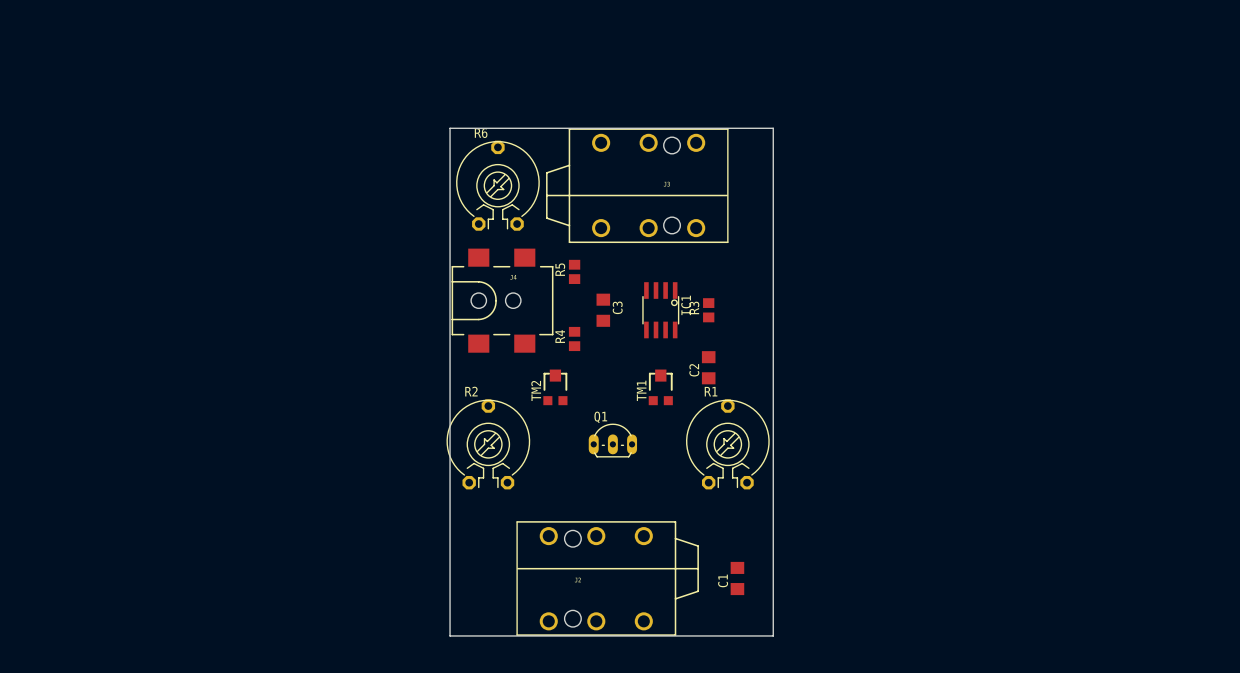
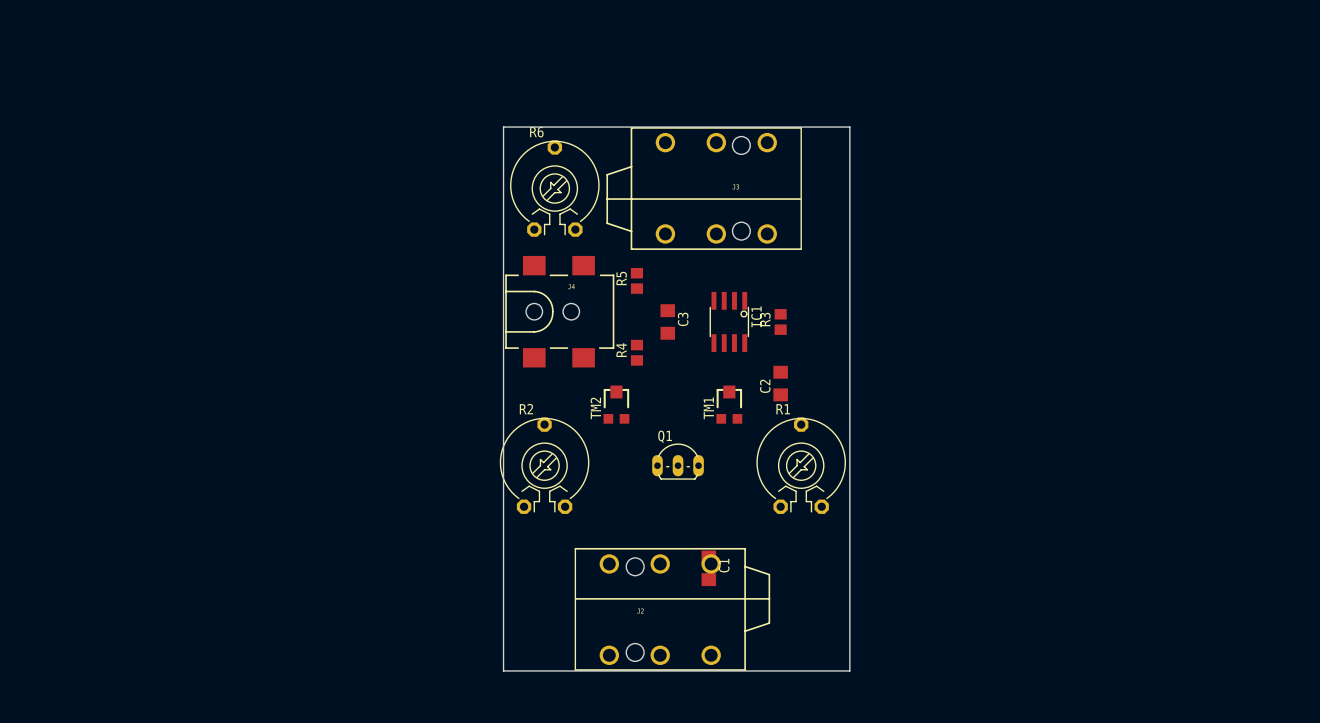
C1 position: (737, 578) -> (708, 568)
C1 name position: C1 (723, 580) -> C1 (724, 565)

